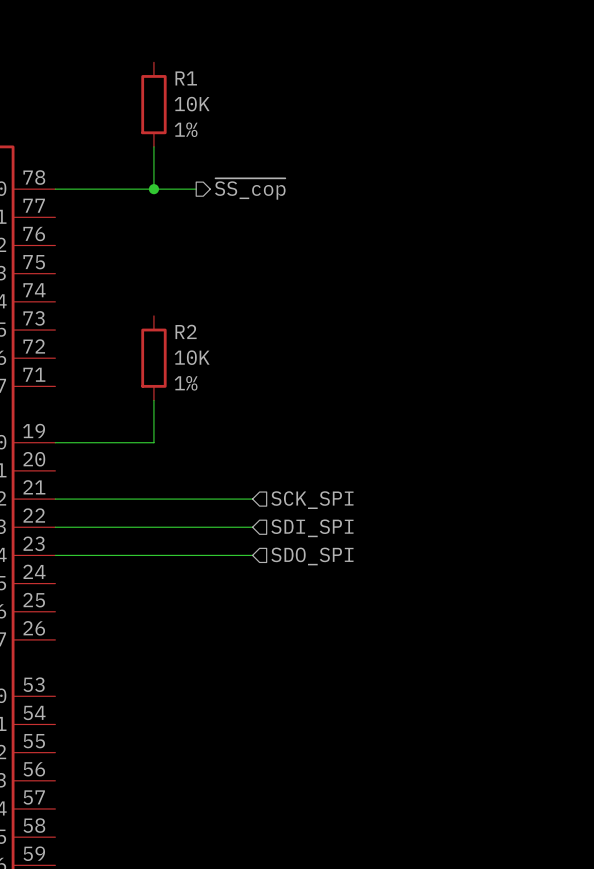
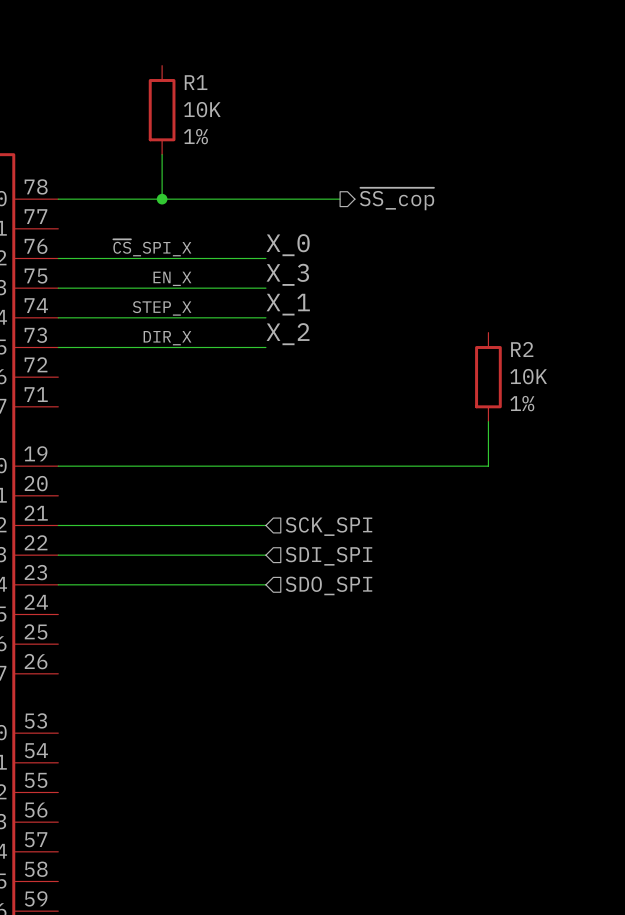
wire: none -> (206, 199) (340, 199)
hierarchical label position: ~{SS_cop} (250, 189) -> ~{SS_cop} (397, 199)
label: none -> X_0 (288, 245)
label: none -> ~{CS}_SPI_X (152, 247)
wire: none -> (58, 258) (265, 258)
label: none -> X_3 (287, 274)
label: none -> EN_X (172, 278)
wire: none -> (58, 288) (265, 288)
label: none -> X_1 (288, 304)
label: none -> STEP_X (162, 308)
wire: none -> (58, 317) (265, 317)
label: none -> X_2 (288, 334)
label: none -> DIR_X (167, 338)
wire: none -> (58, 347) (265, 347)
R2 position: (153, 358) -> (488, 377)
wire: (153, 400) (153, 442) -> (488, 421) (488, 466) (162, 466)

